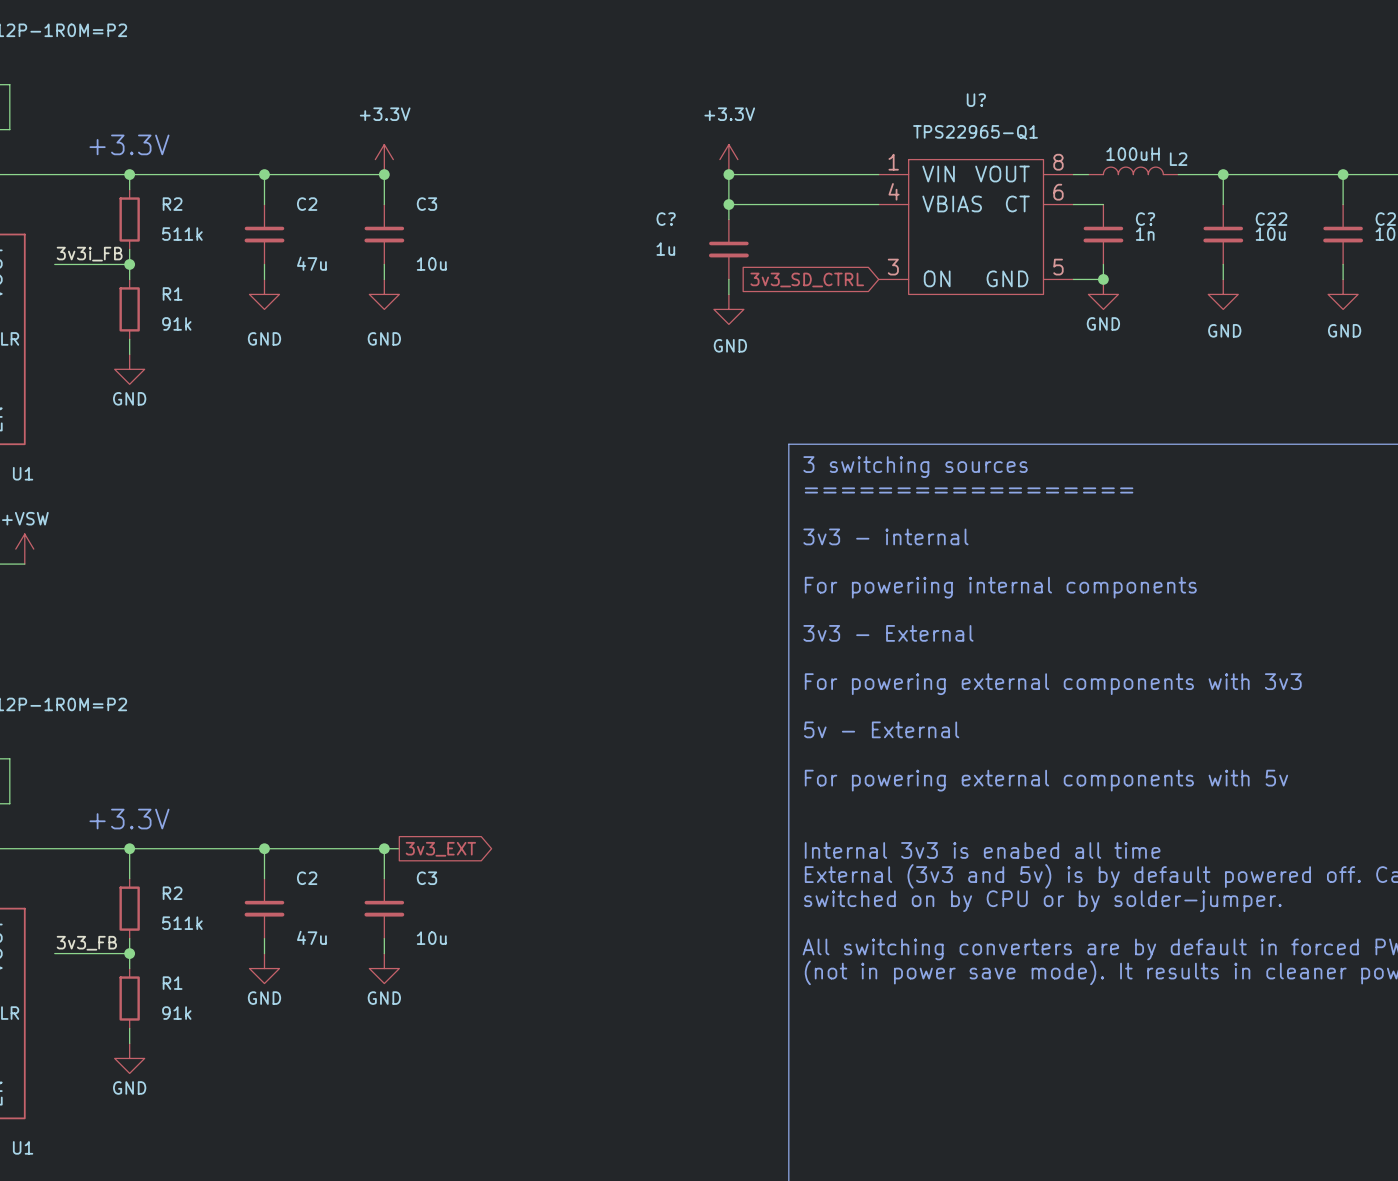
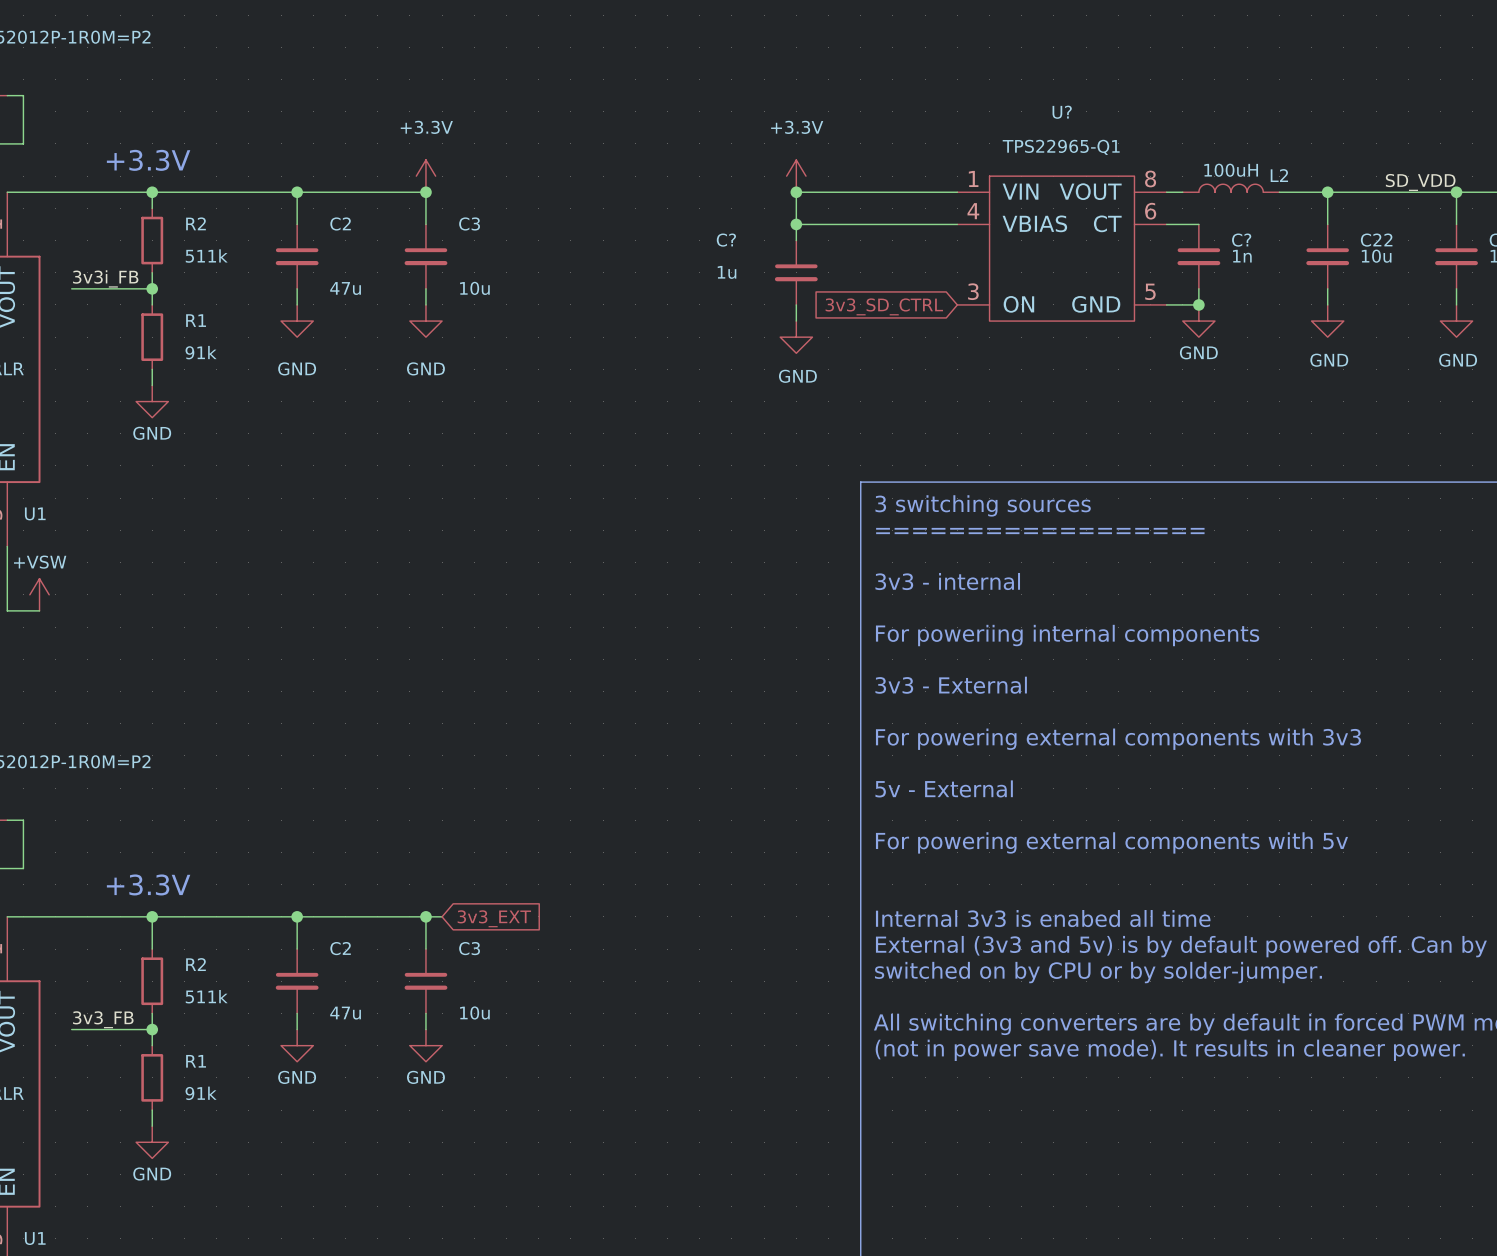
label: none -> SD_VDD (1420, 182)
global label shape: output (440, 849) -> input (494, 918)

